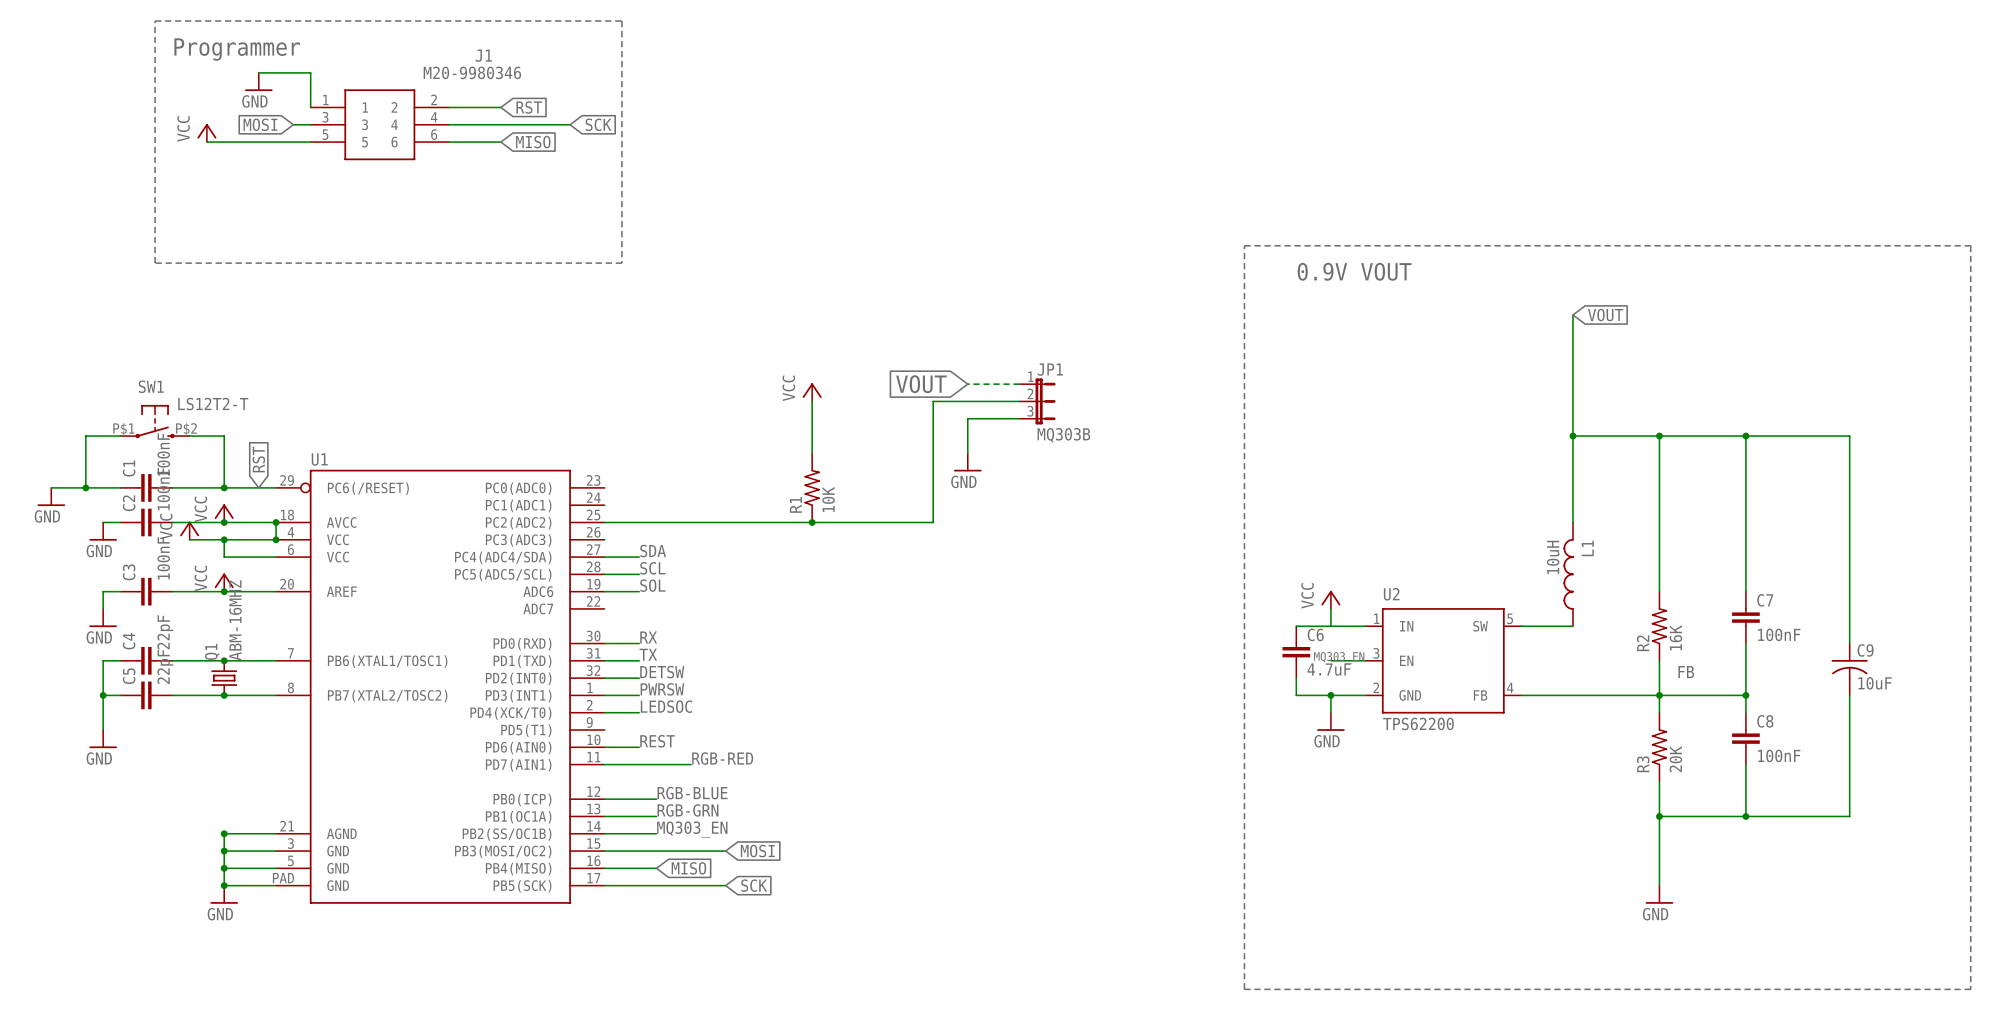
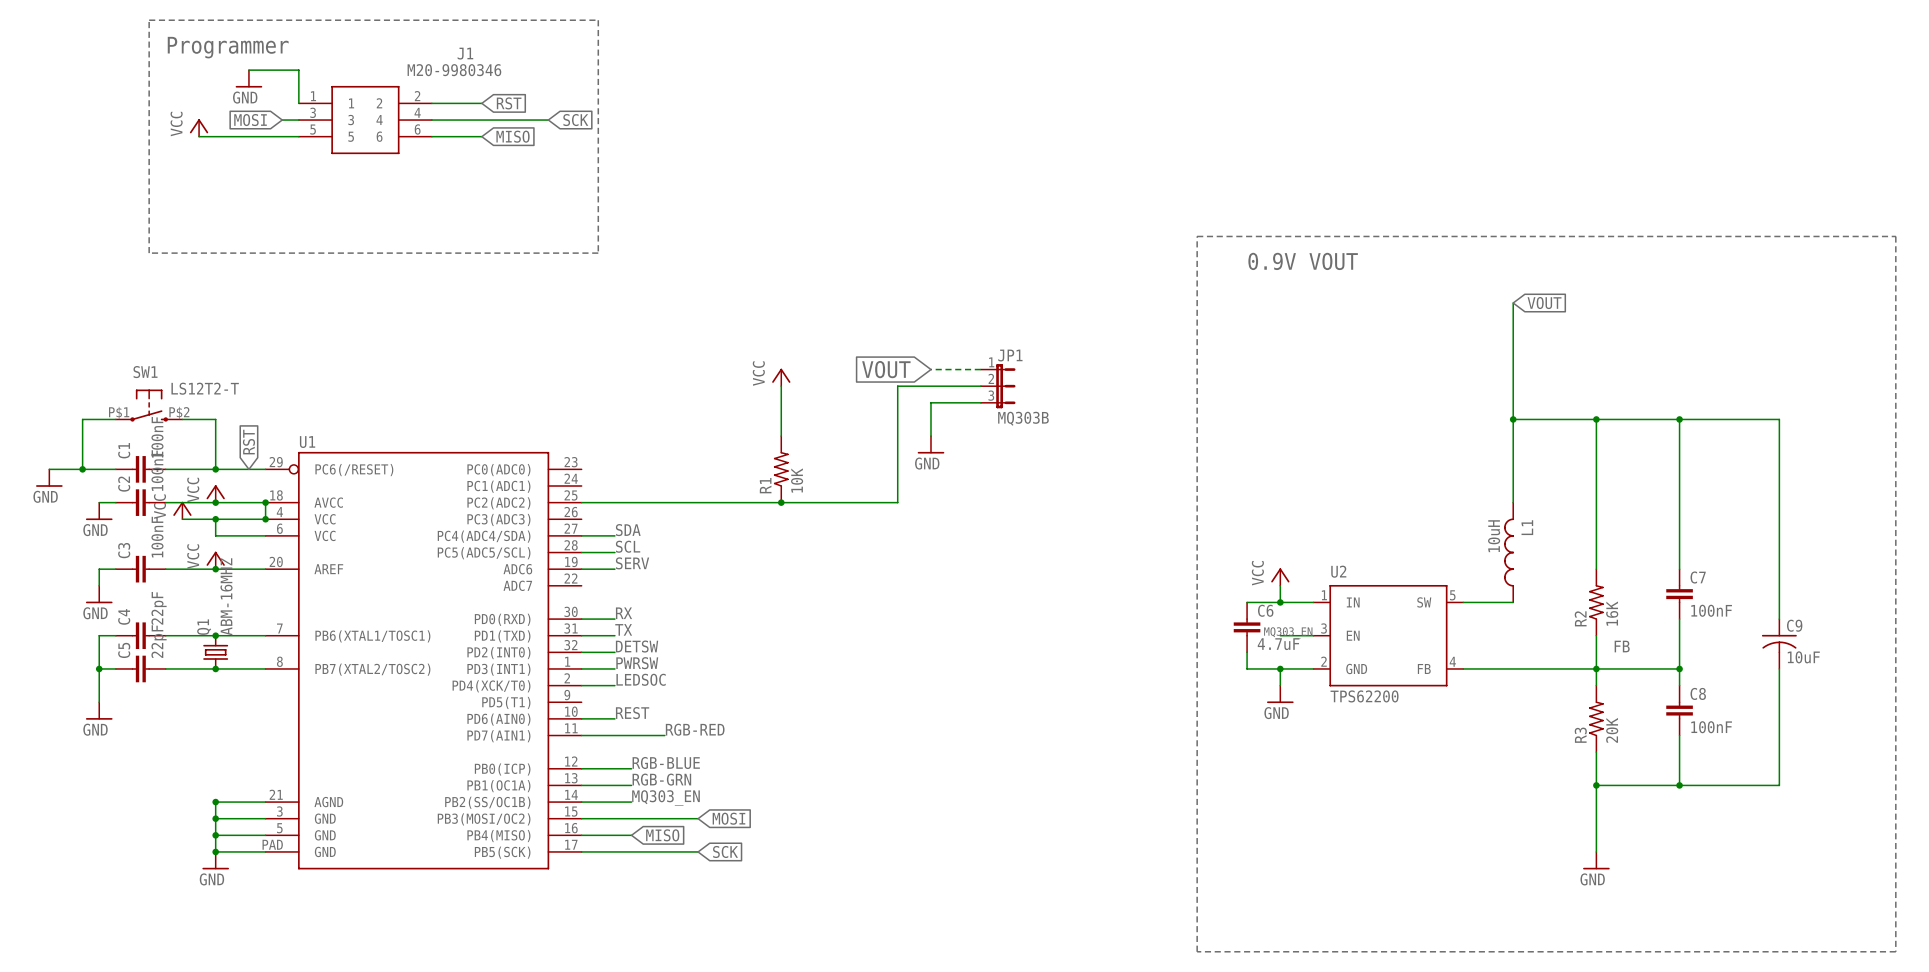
label: SOL (652, 585) -> SERV (632, 563)
junction: none -> (1280, 602)

